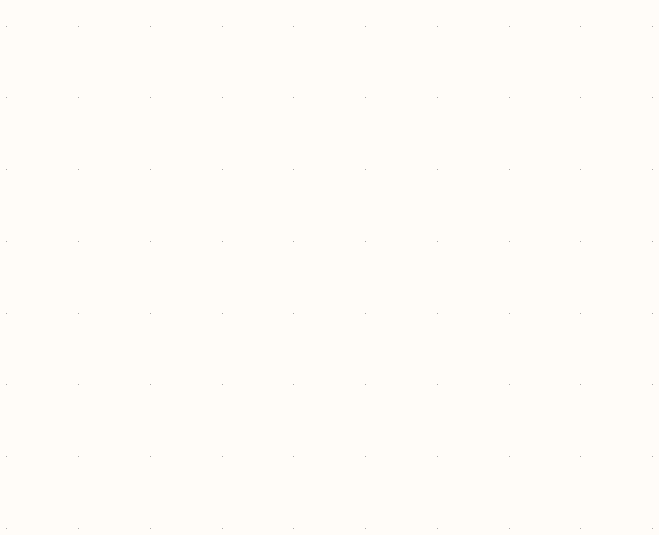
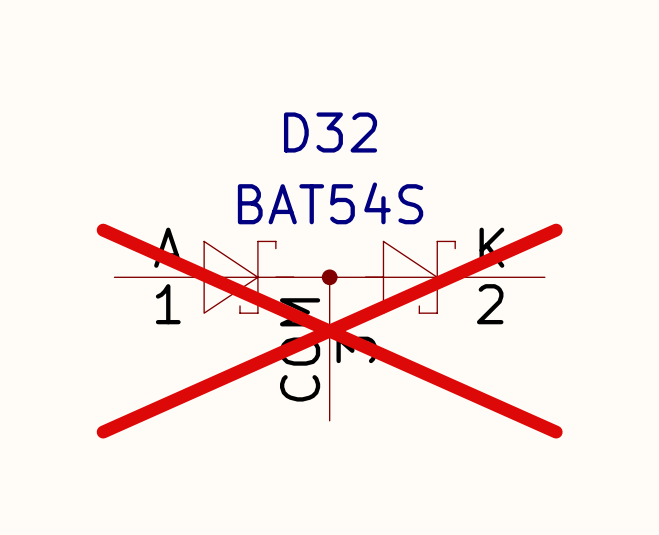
D32: none -> BAT54S (329, 331)

